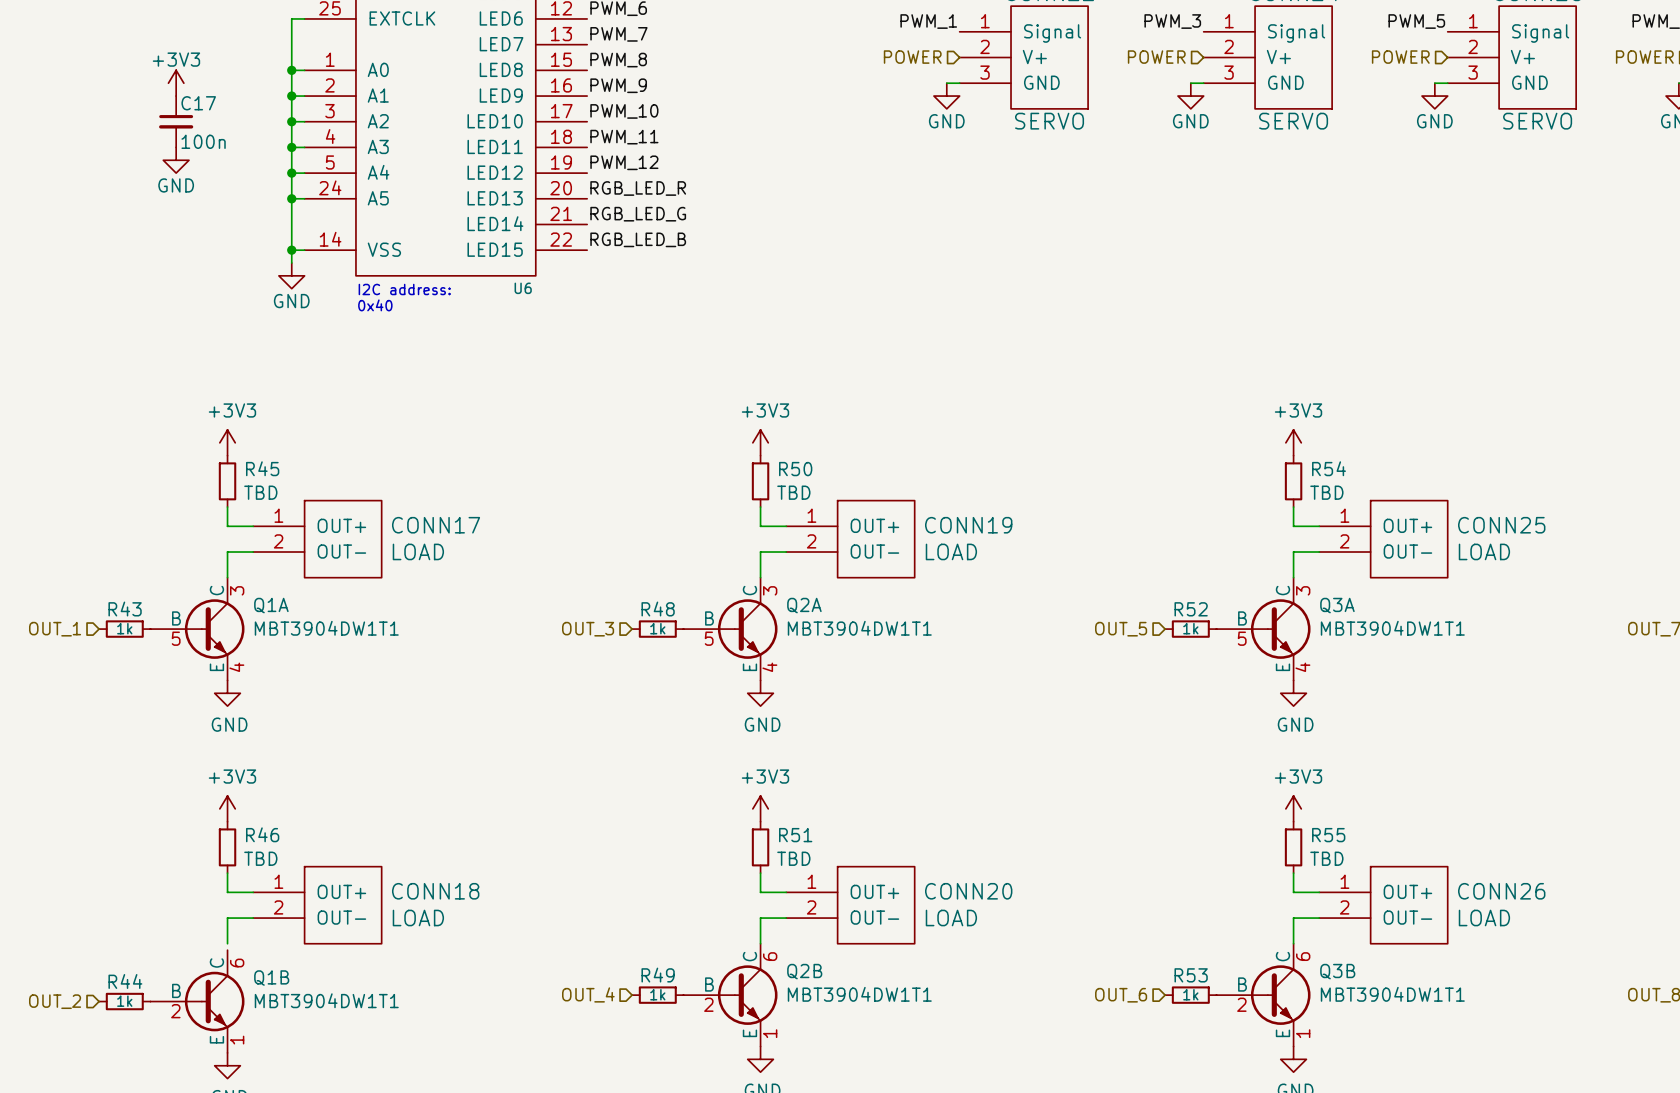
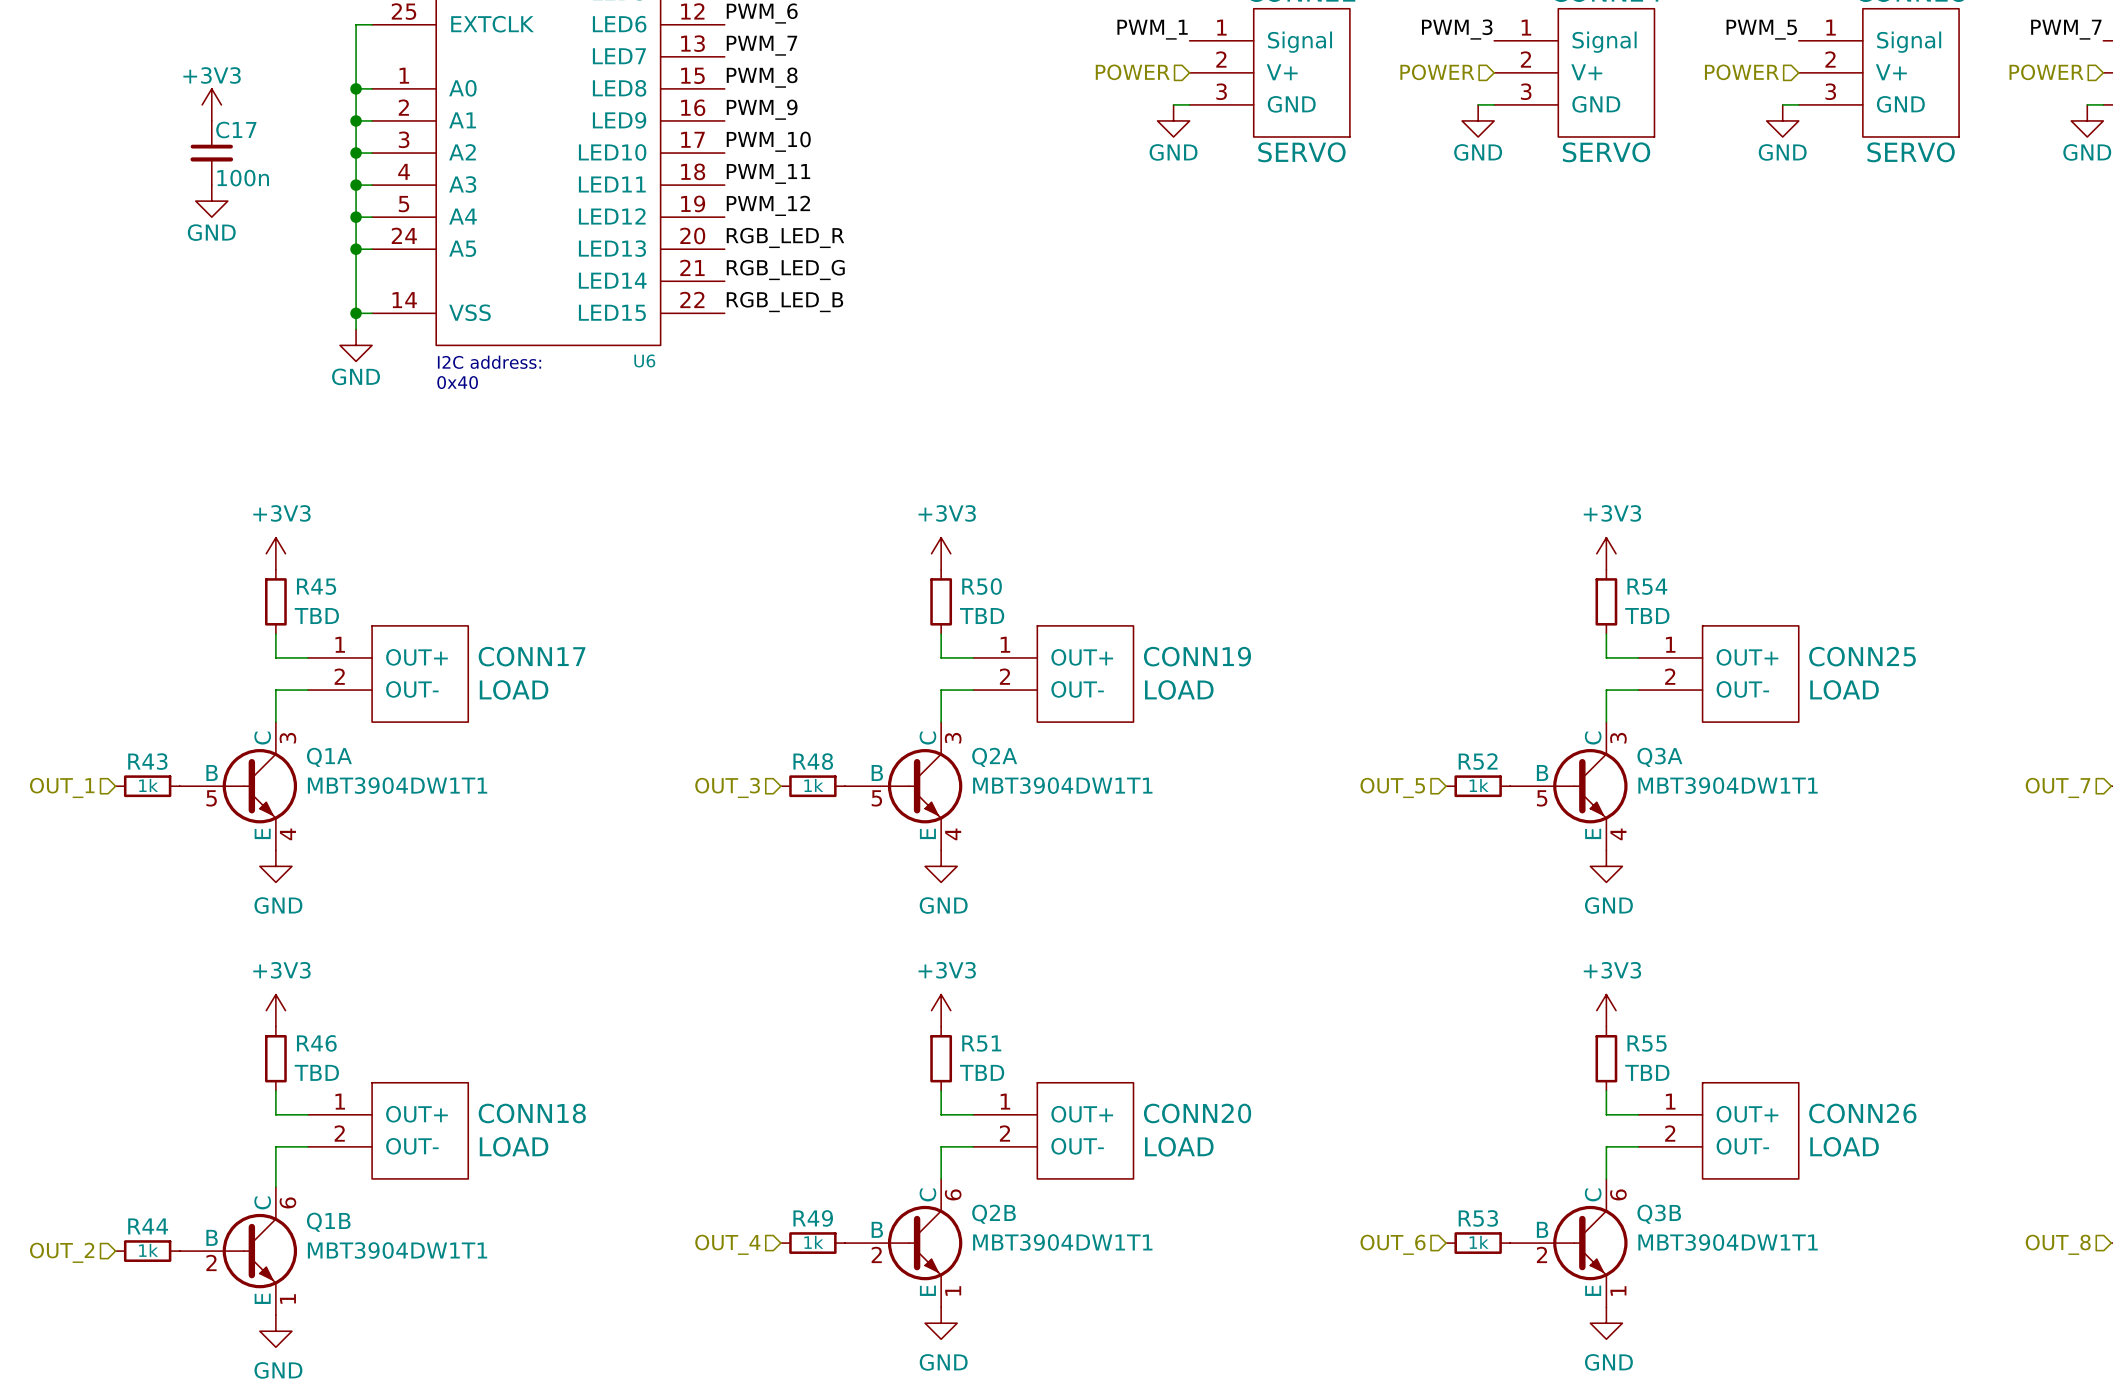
wire: none -> (275, 1178) (275, 1186)

